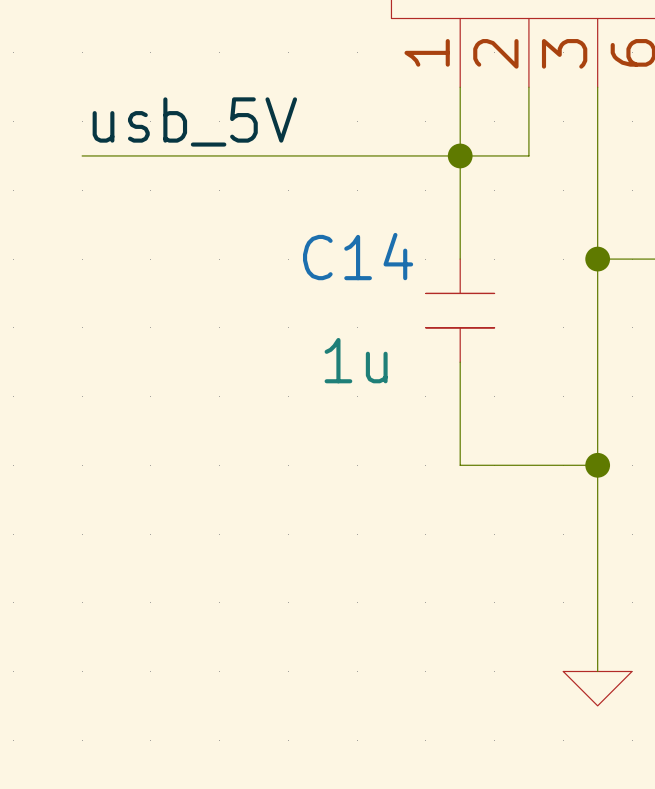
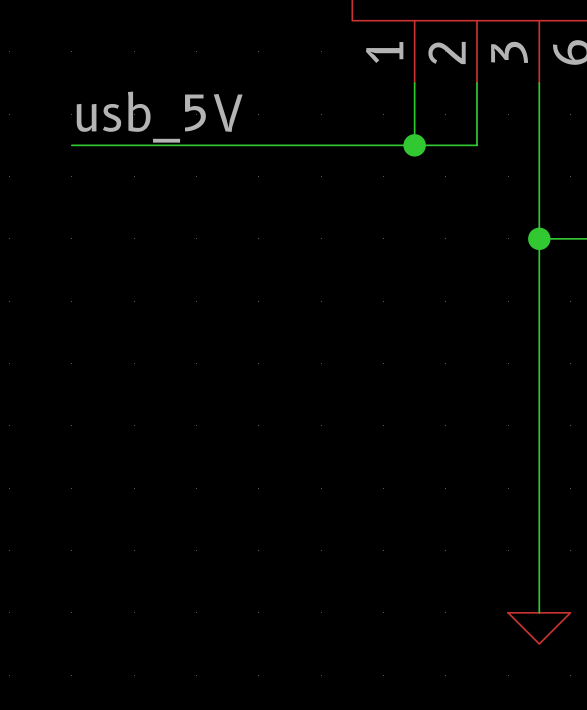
wire: (460, 155) (460, 259) -> none
C14: (460, 310) -> none
wire: (460, 362) (460, 465) (597, 465) -> none
junction: (597, 465) -> none

